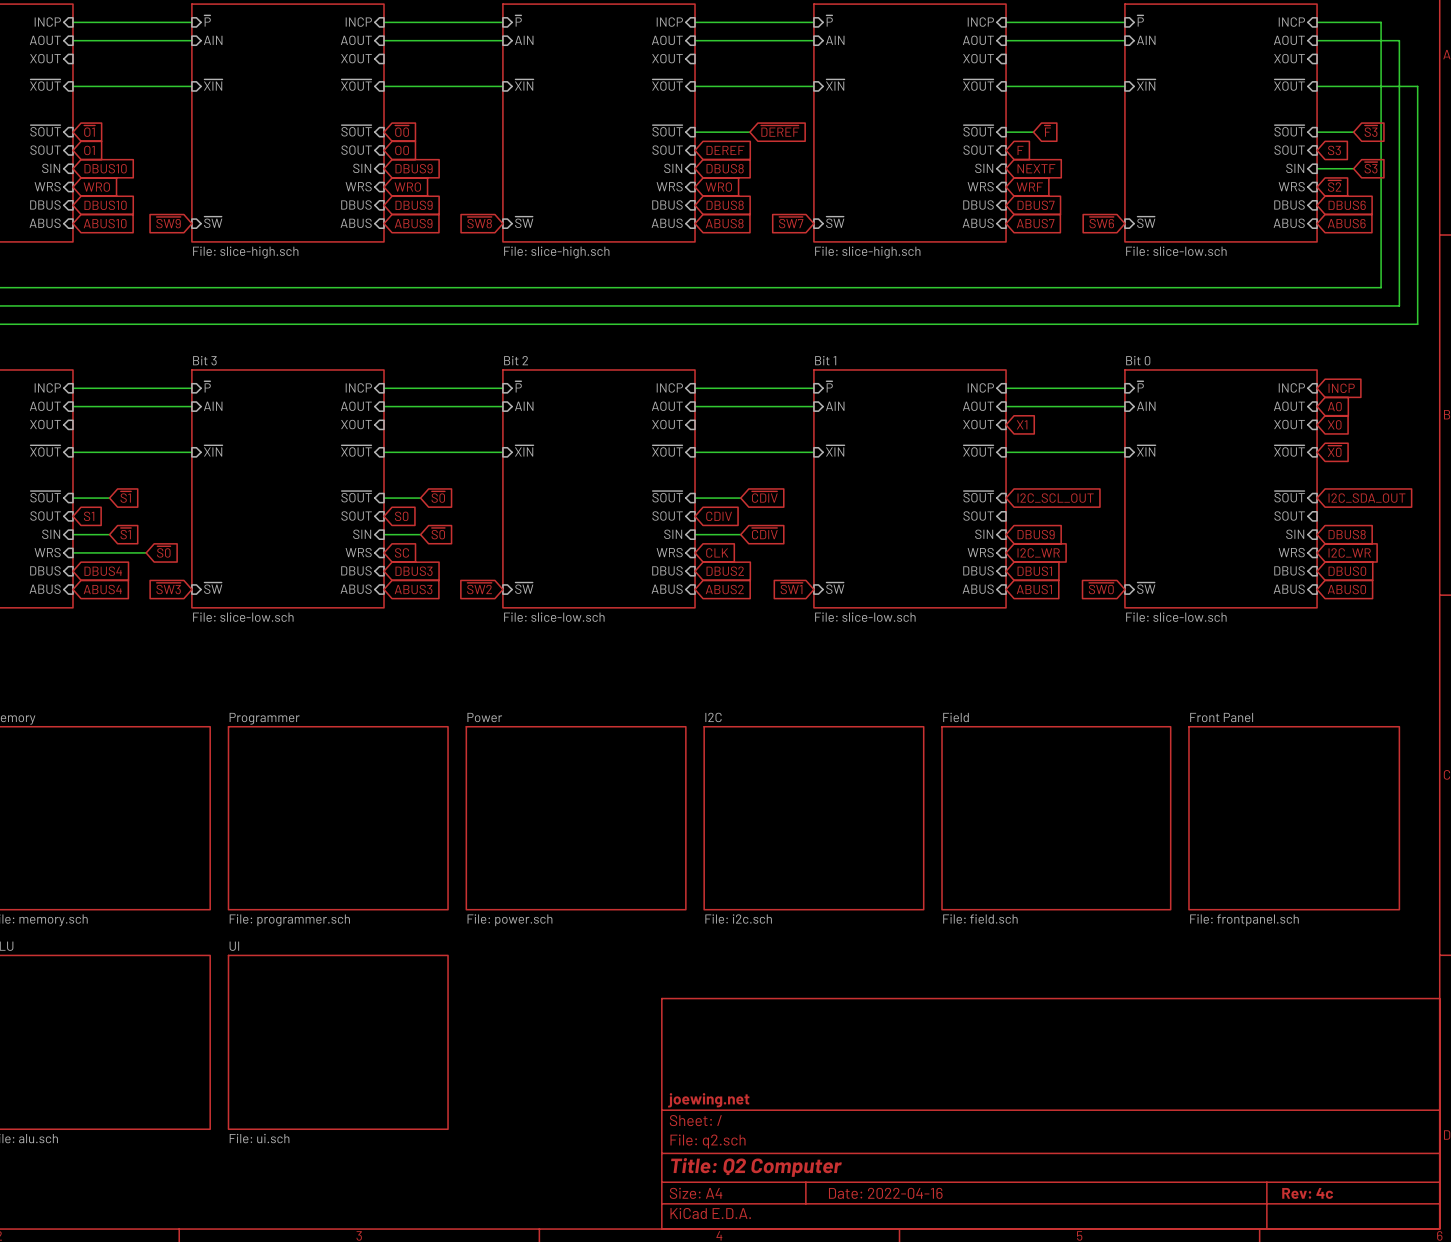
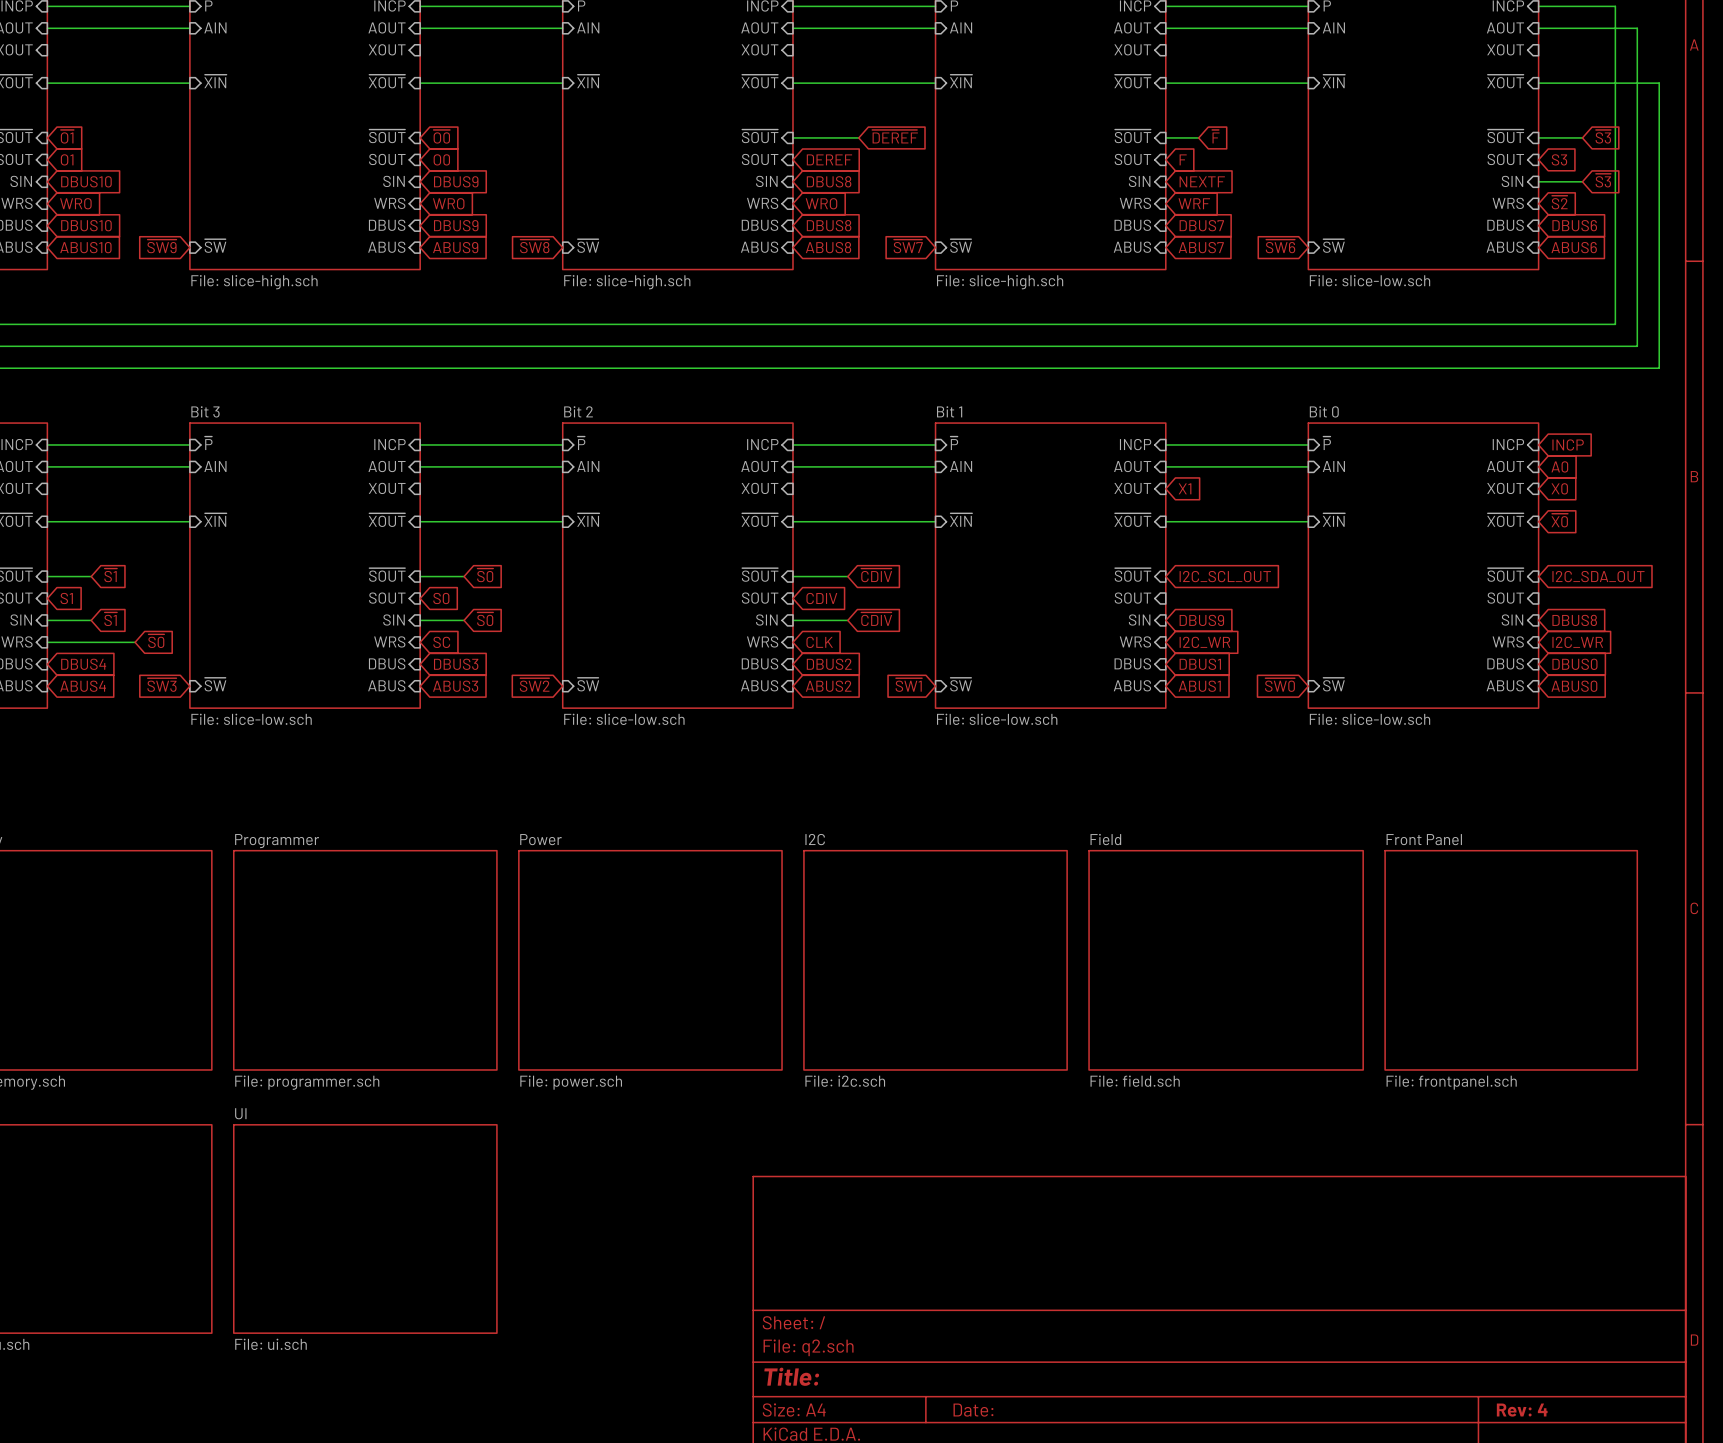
title block: joewing.net (708, 1100) -> none
title block: Title: Q2 Computer (756, 1167) -> Title: (791, 1376)
title block: Date: 2022-04-16 (885, 1193) -> Date: (973, 1410)
title block: Rev: 4c (1307, 1193) -> Rev: 4 (1522, 1410)

